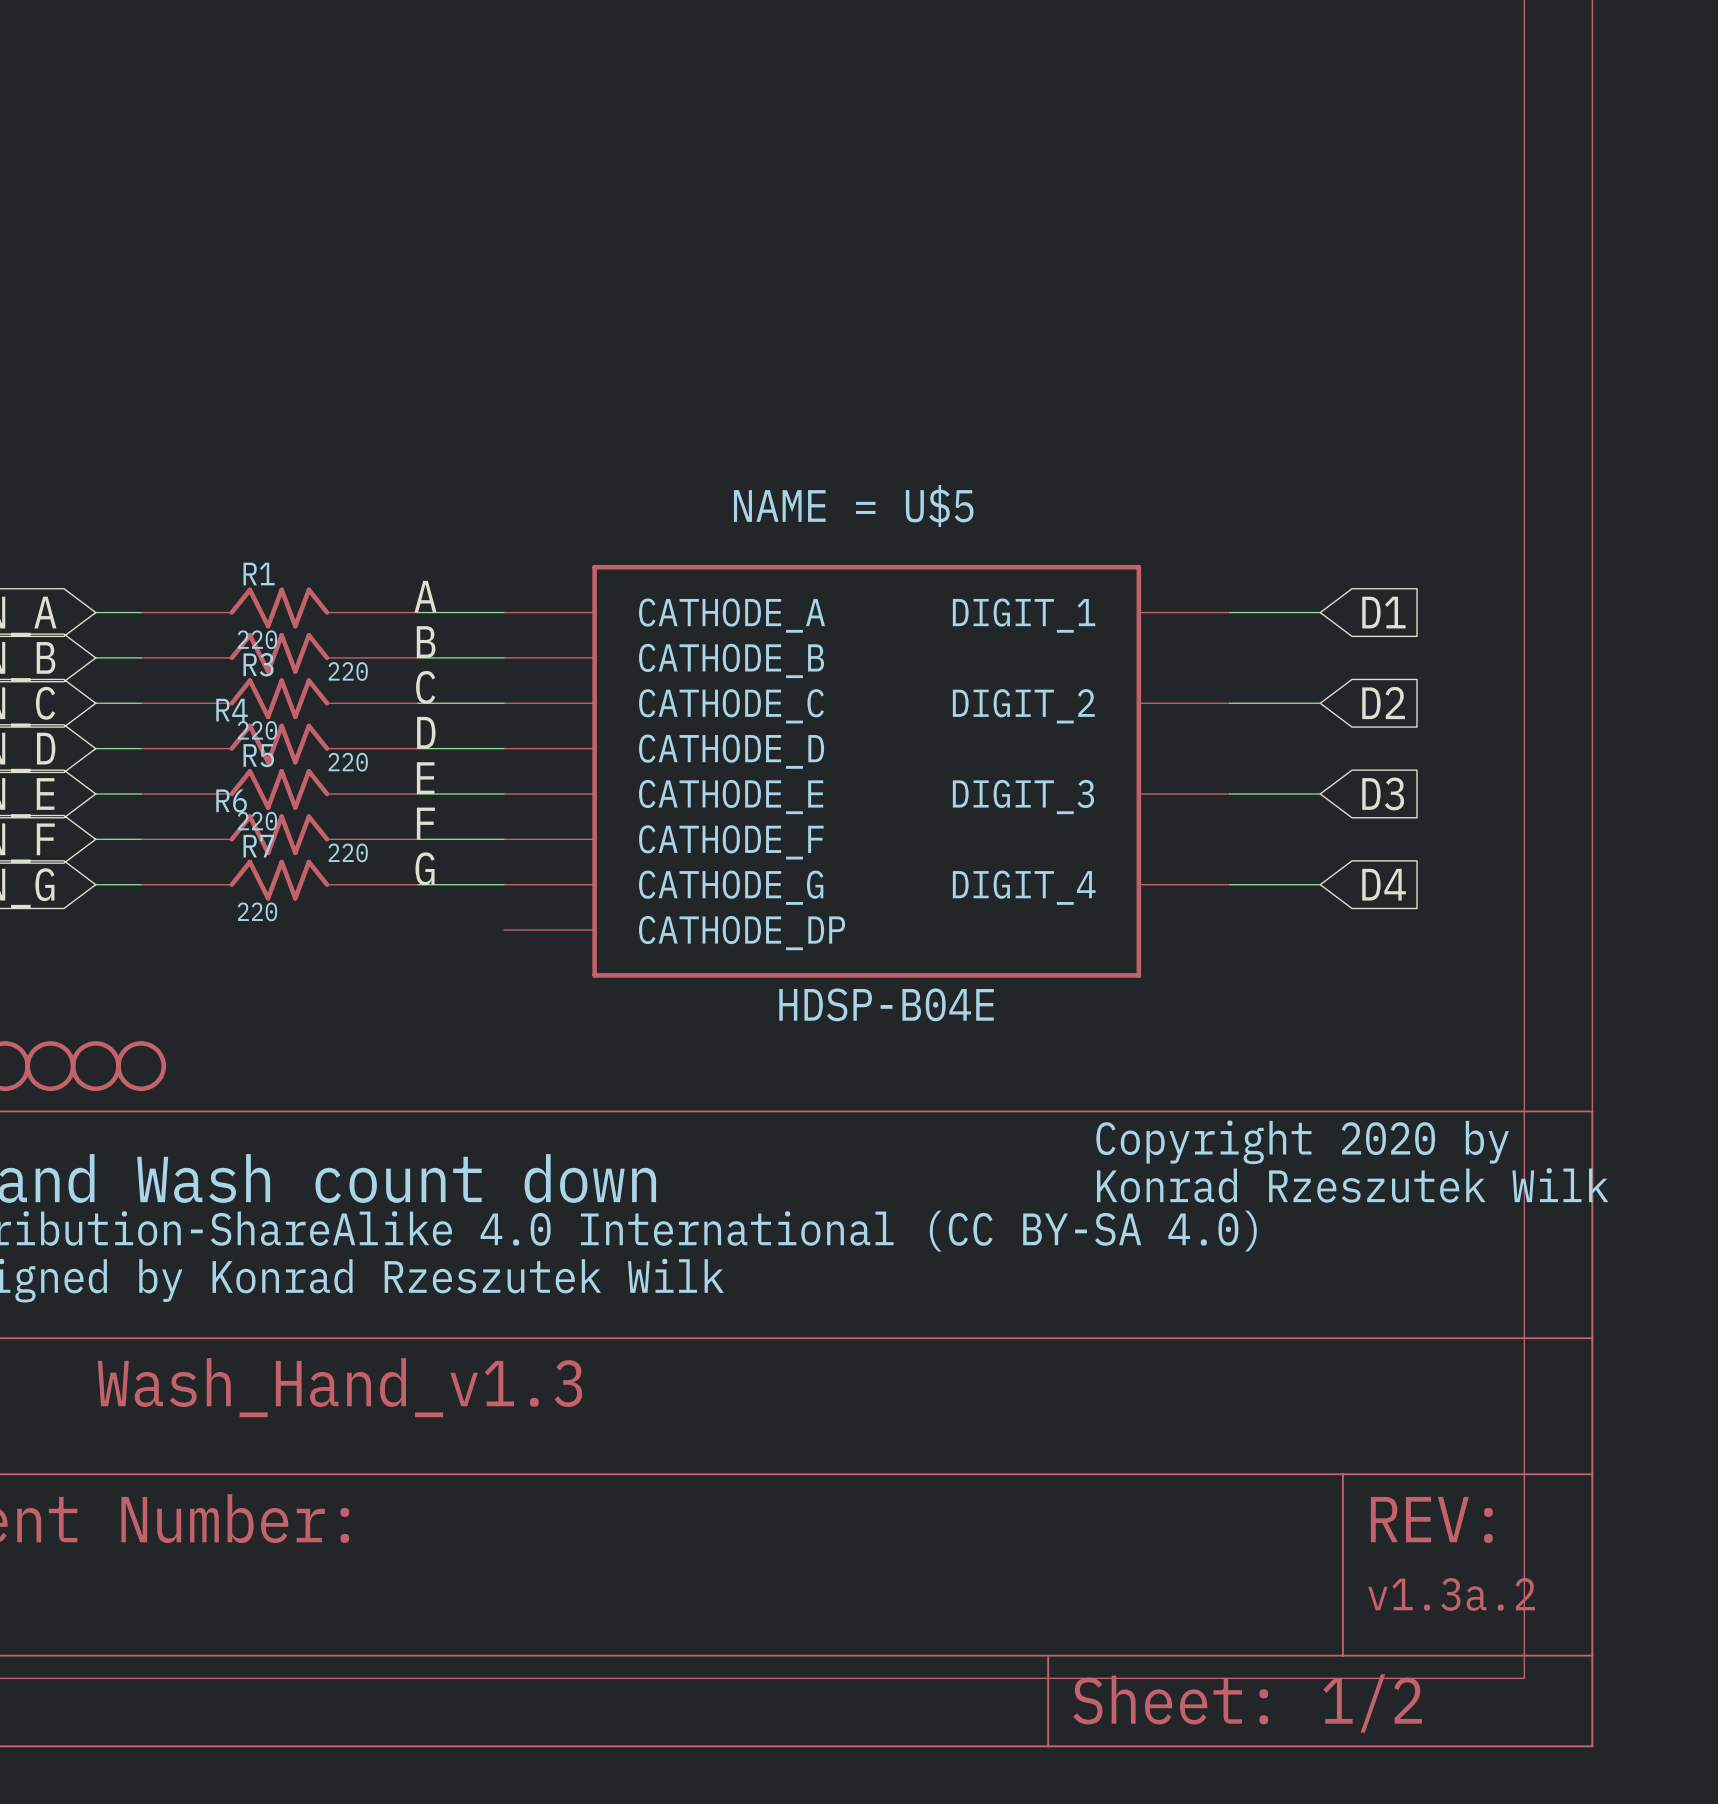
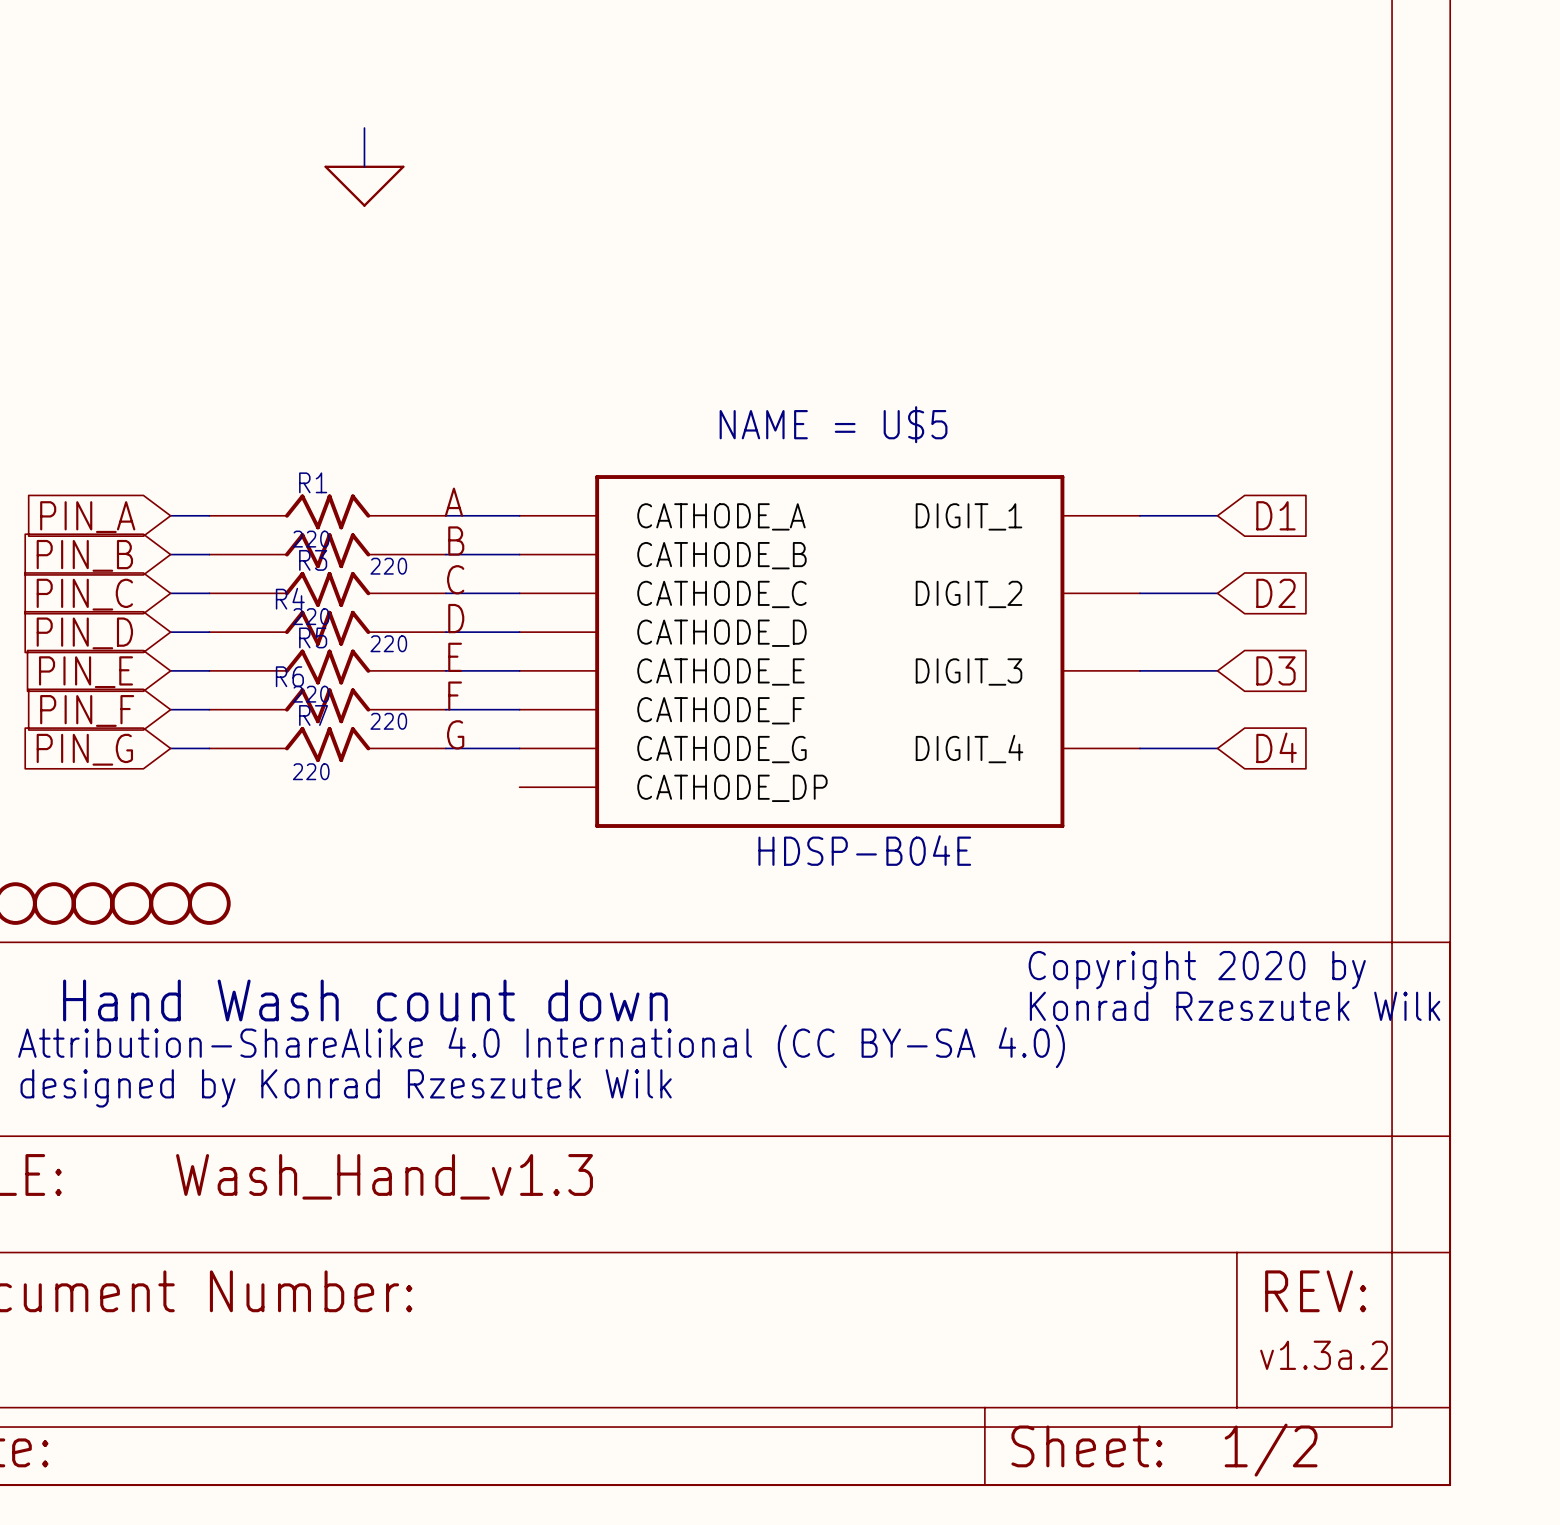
wire: none -> (364, 128) (364, 166)
power symbol: none -> (364, 186)

